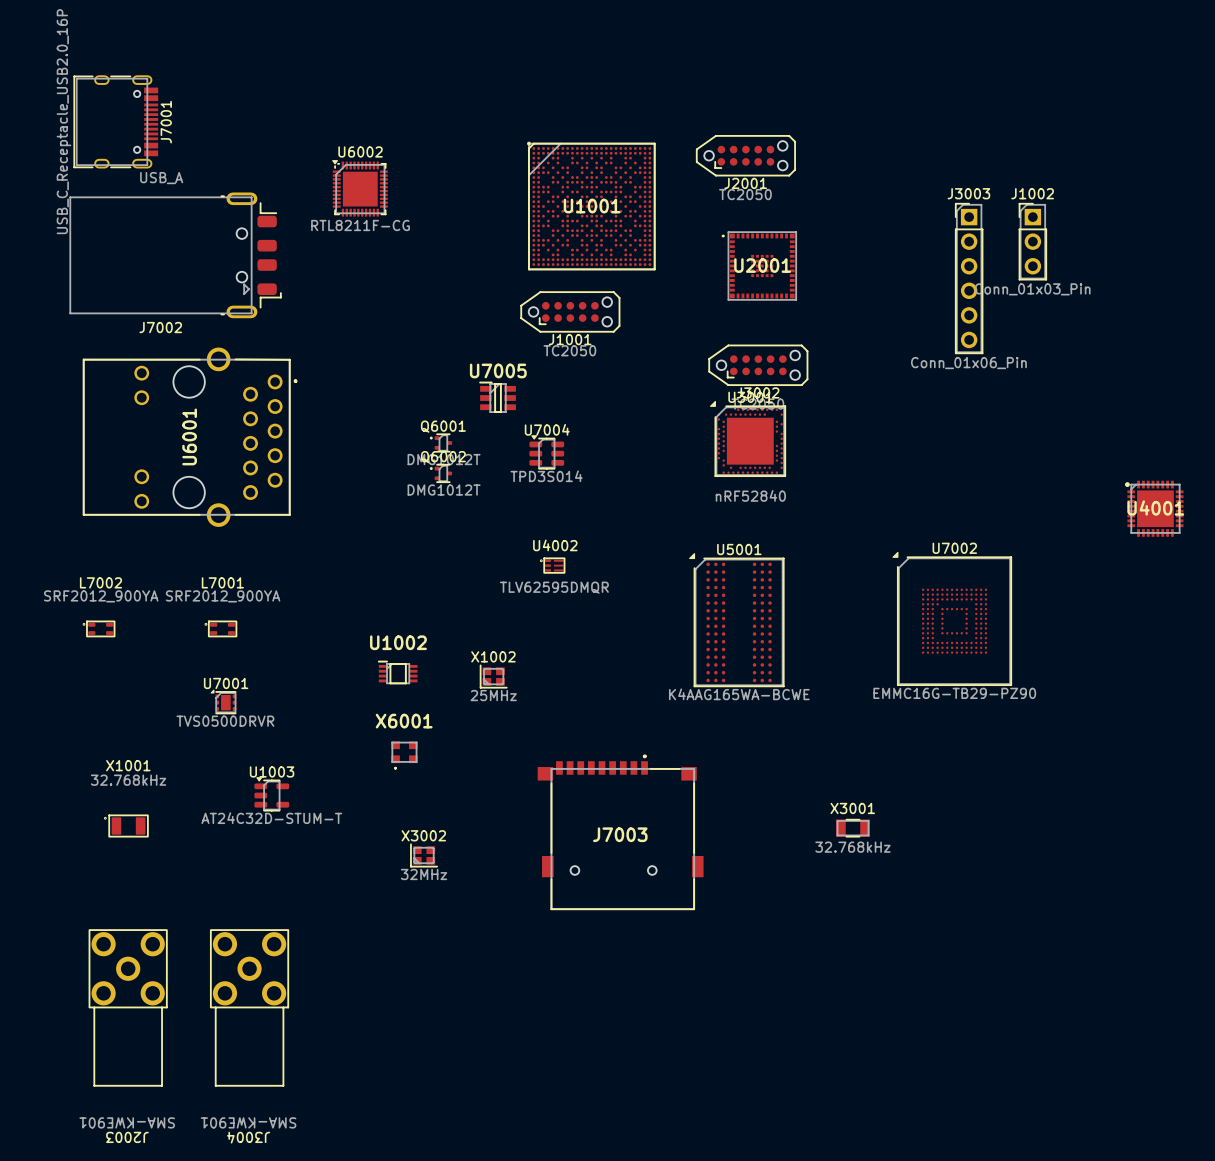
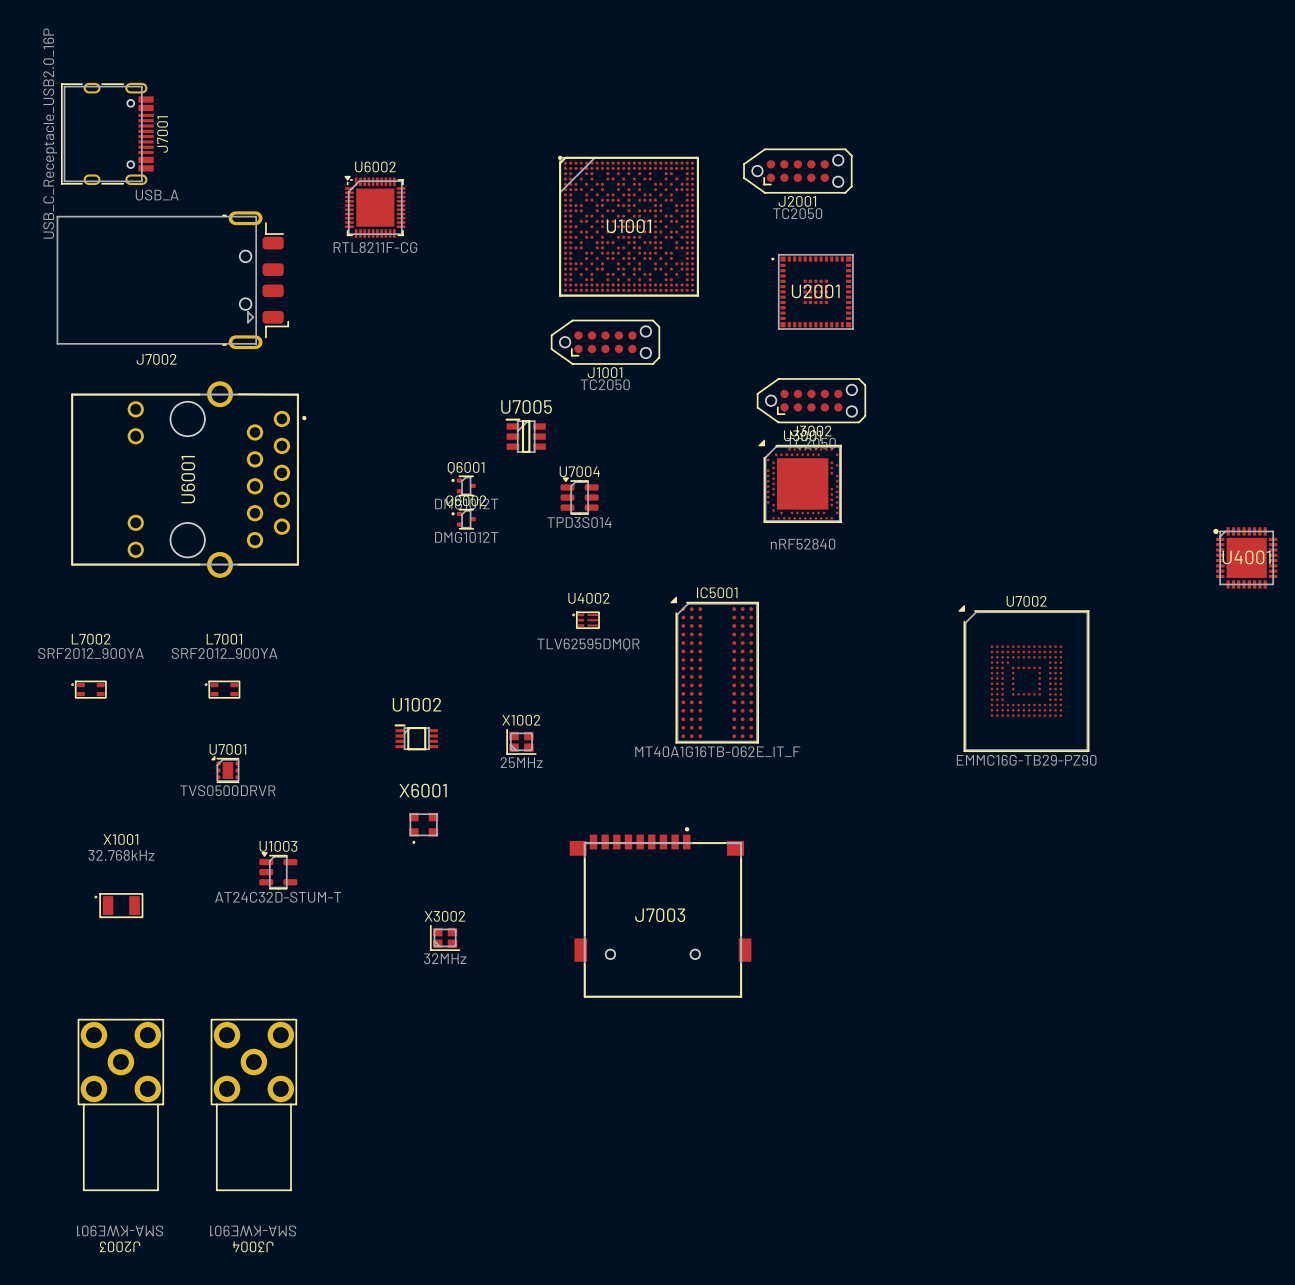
J1002: Conn_01x03_Pin (1032, 241) -> none
J3003: Conn_01x06_Pin (969, 278) -> none
IC5001: none -> MT40A1G16TB-062E_IT_F (714, 670)
U5001: K4AAG165WA-BCWE (736, 619) -> none
X3001: 32.768kHz (852, 828) -> none

